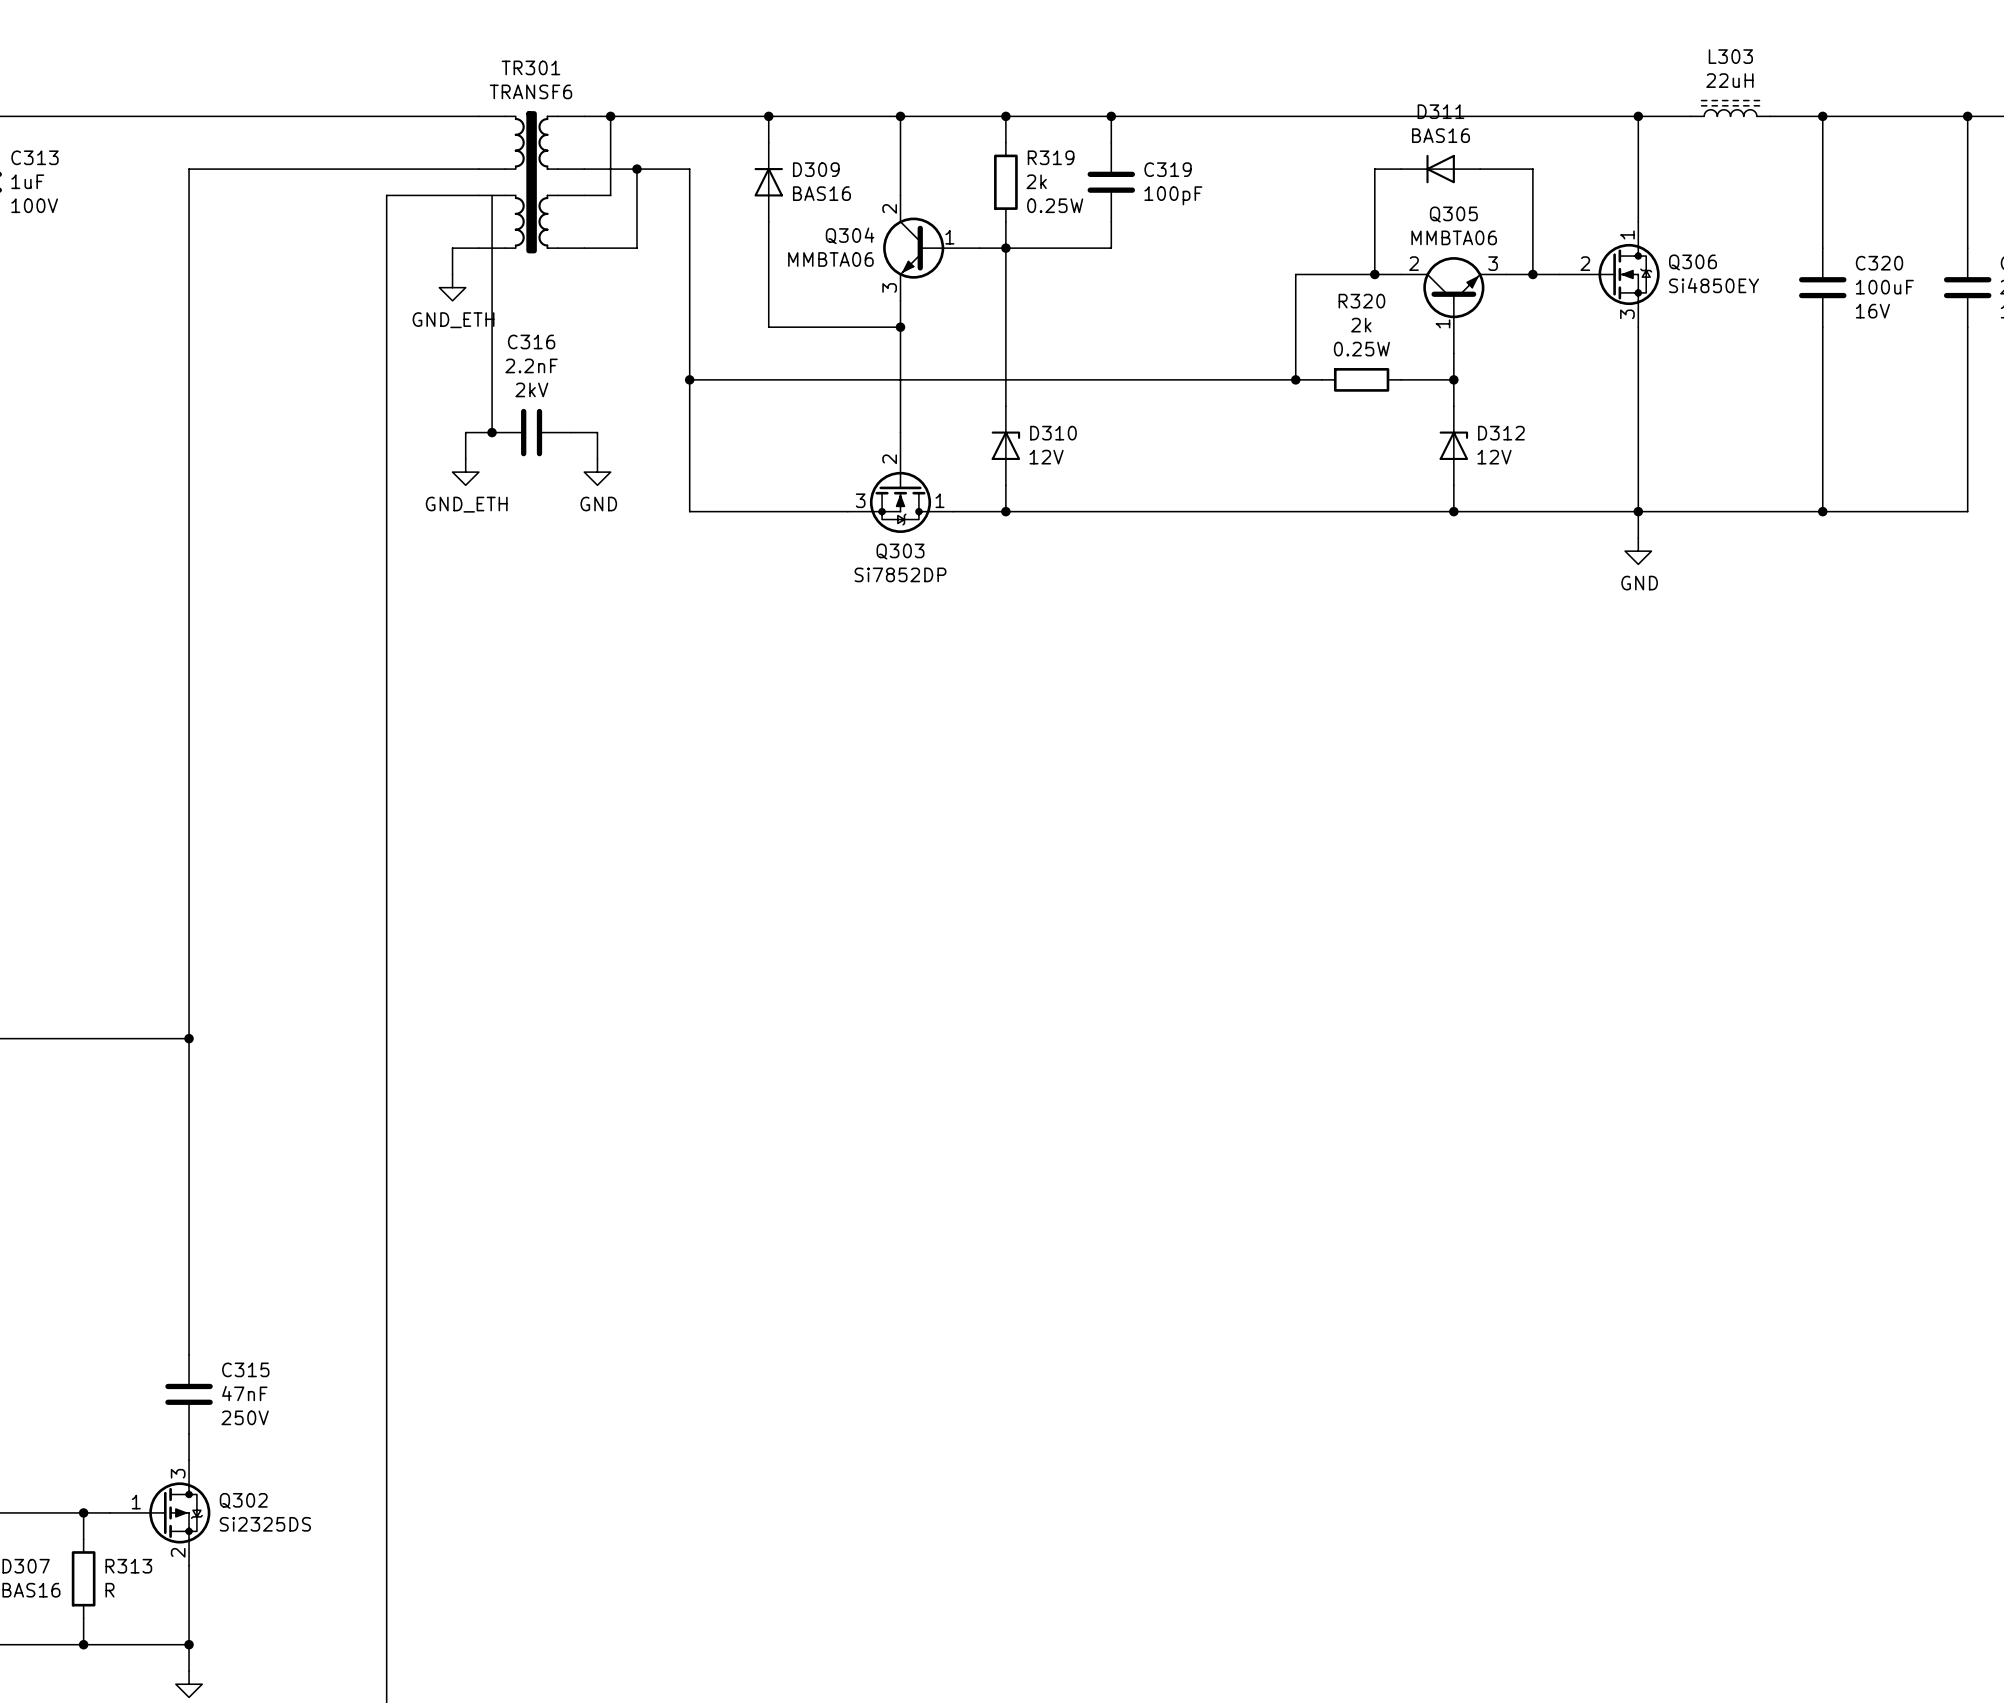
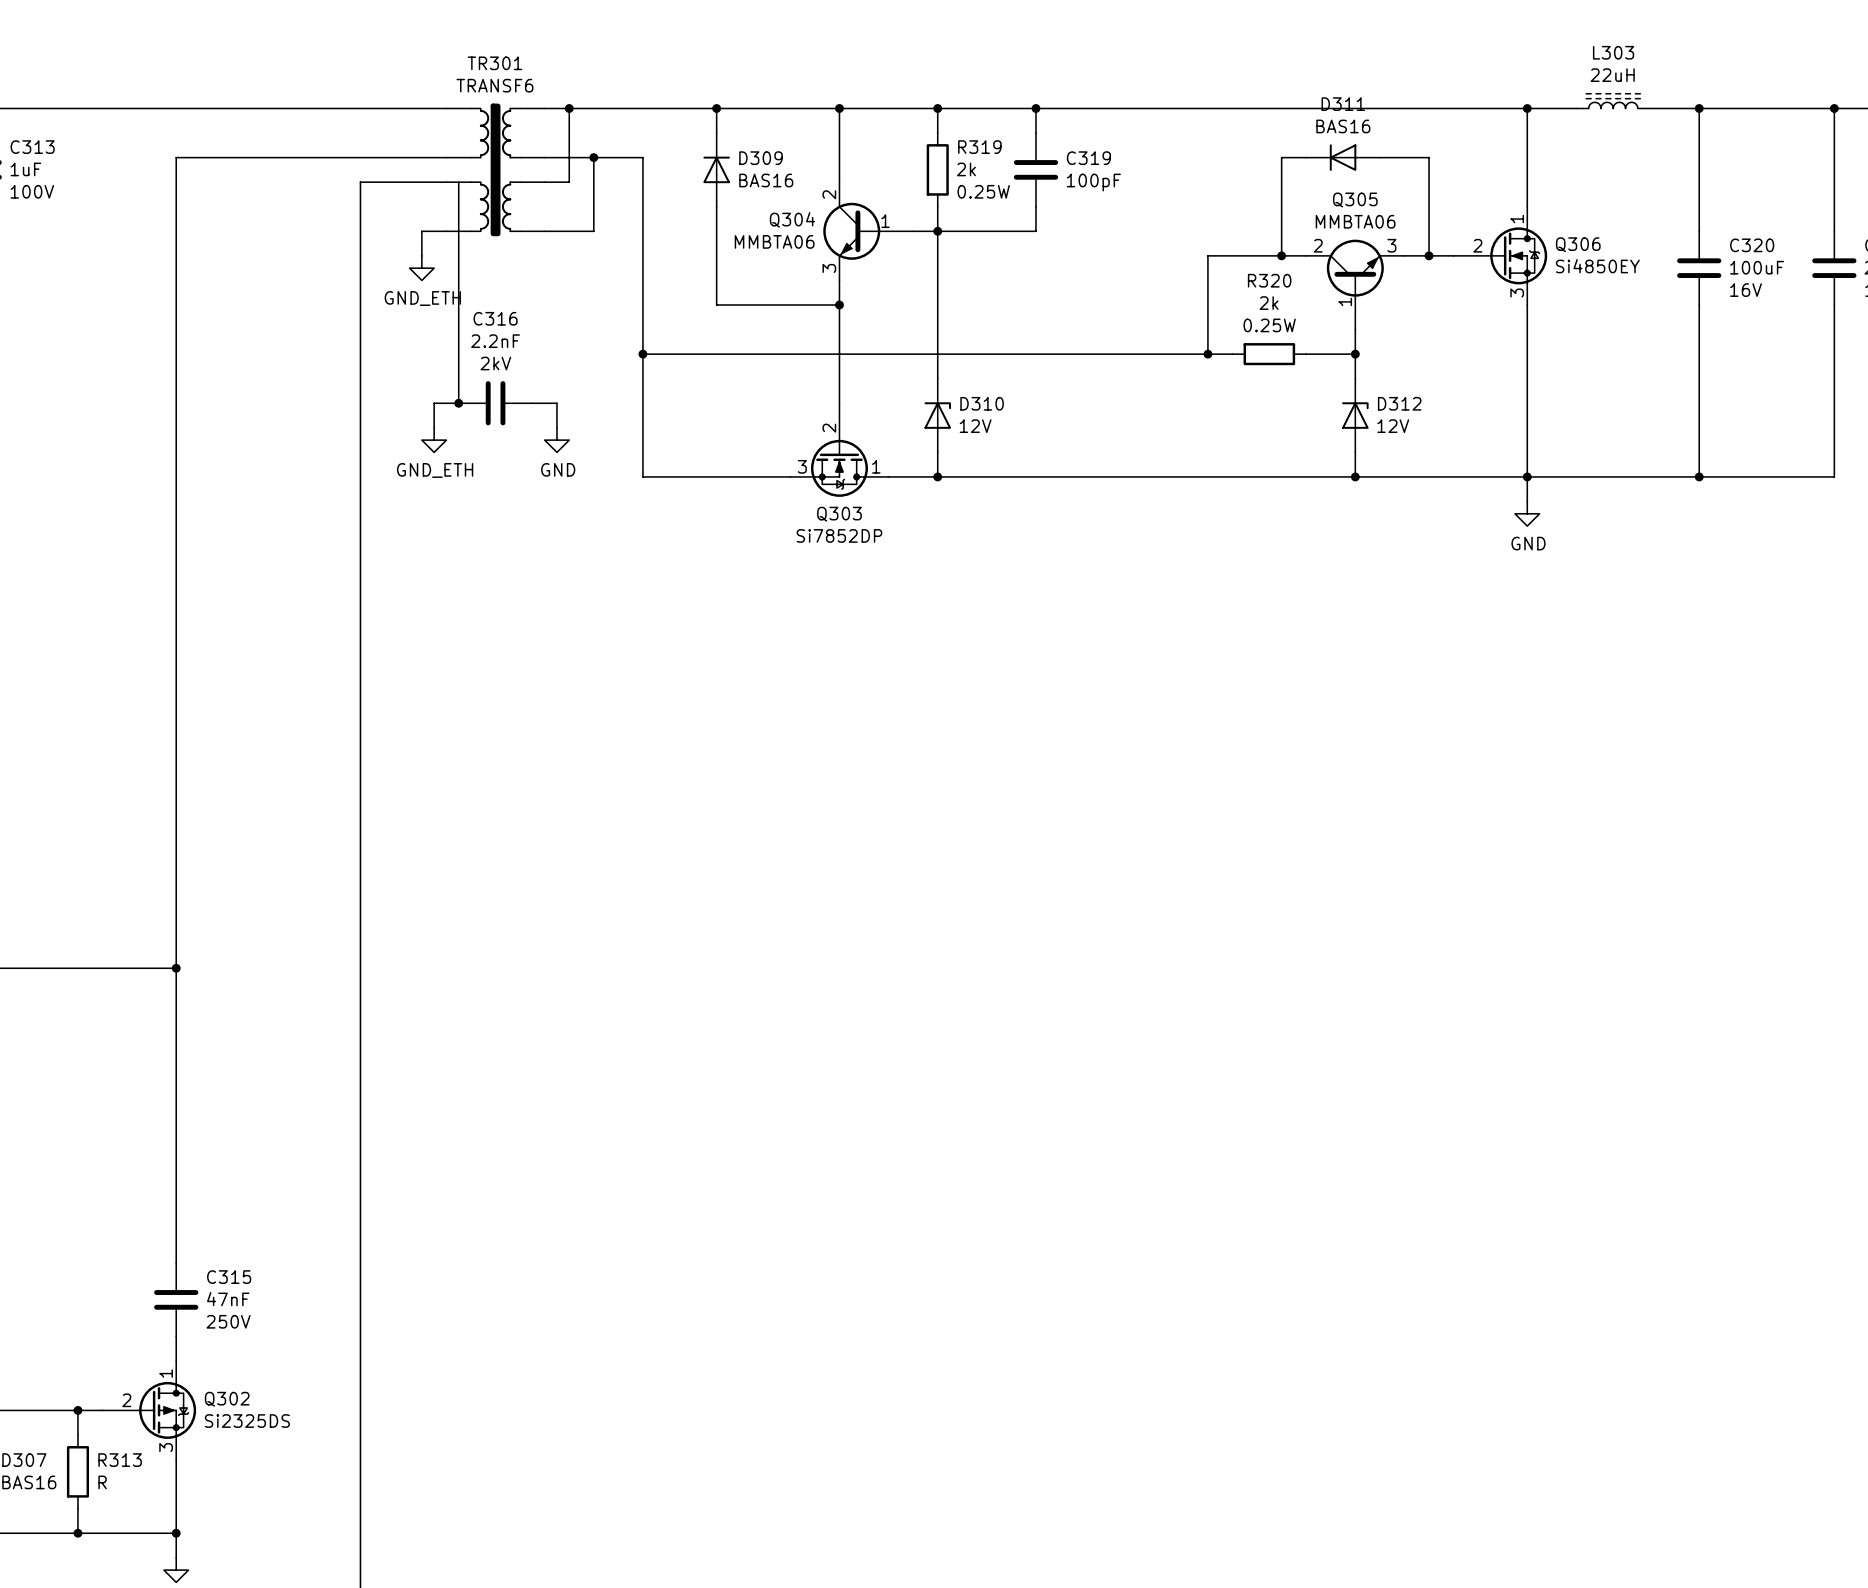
Q302 pin number: 3 (178, 1473) -> 1 (166, 1373)
Q302 pin number: 1 (136, 1502) -> 2 (126, 1400)
Q302 pin number: 2 (178, 1552) -> 3 (166, 1447)

